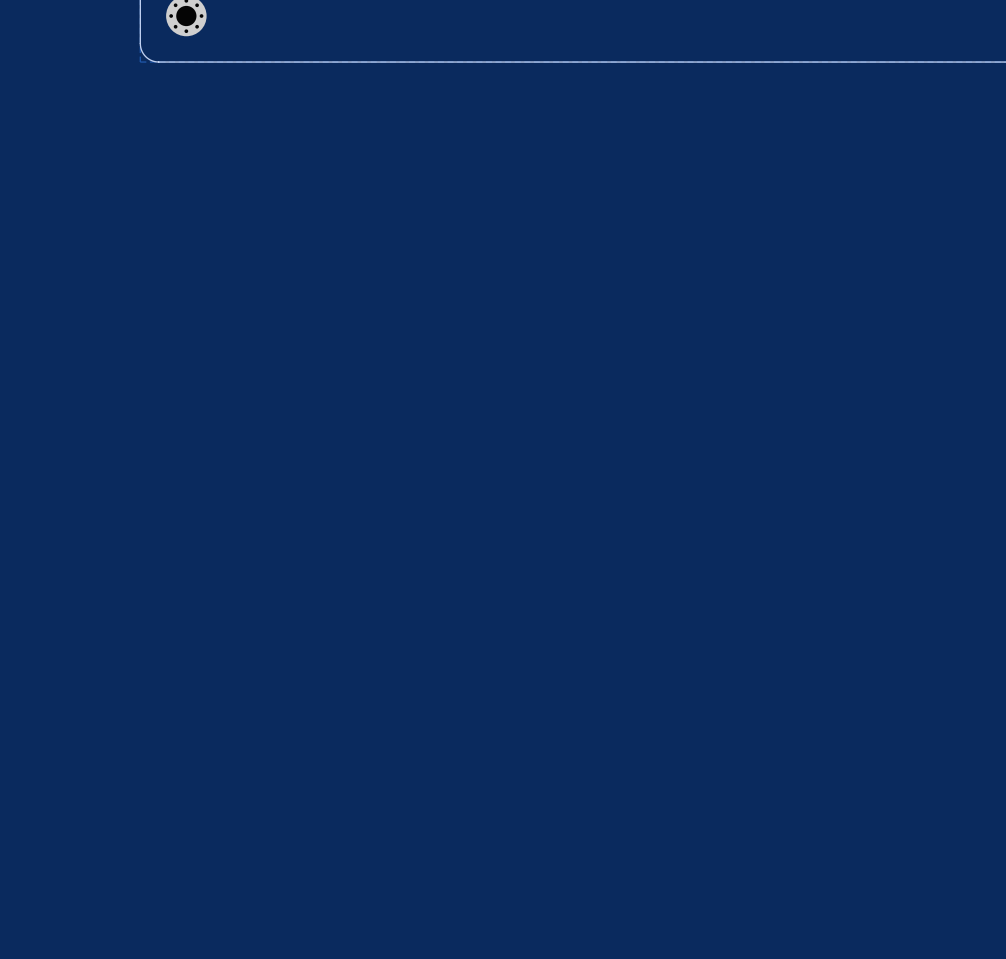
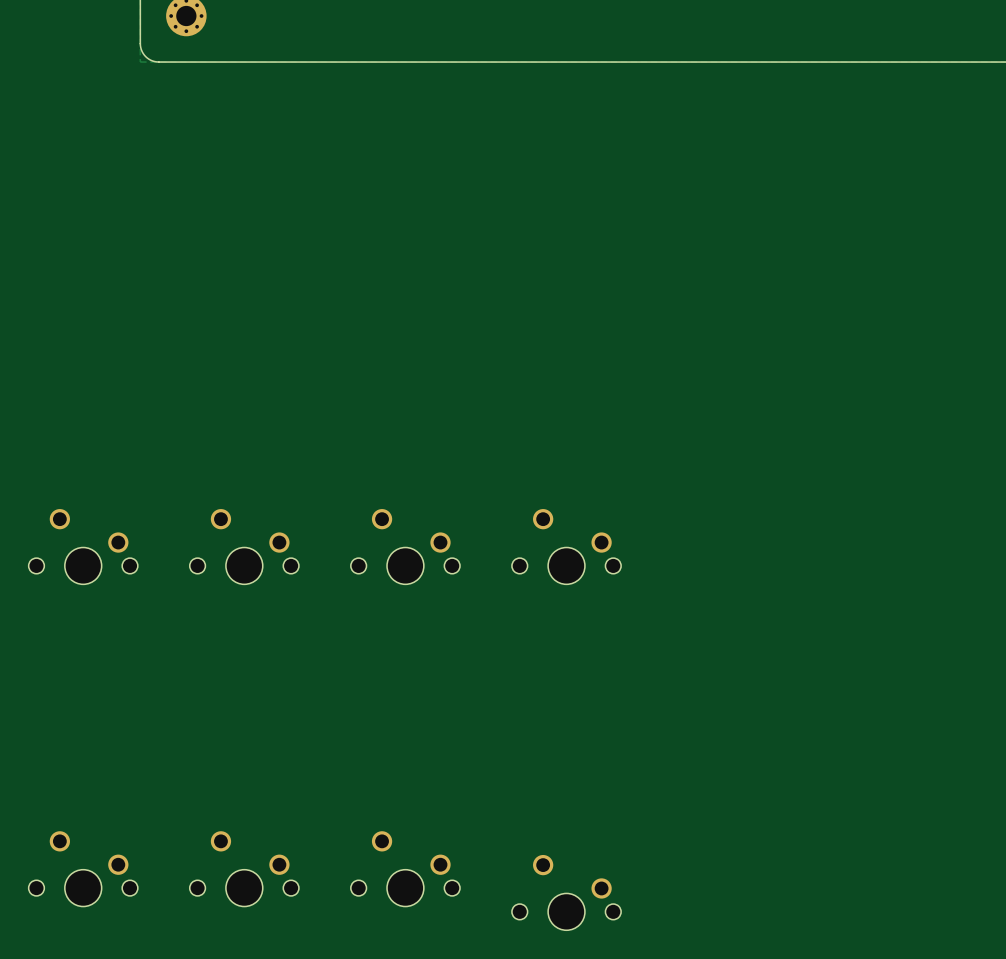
part: none -> (83, 546)
part: none -> (244, 546)
part: none -> (405, 546)
part: none -> (566, 546)
part: none -> (83, 868)
part: none -> (244, 868)
part: none -> (405, 868)
part: none -> (566, 892)

